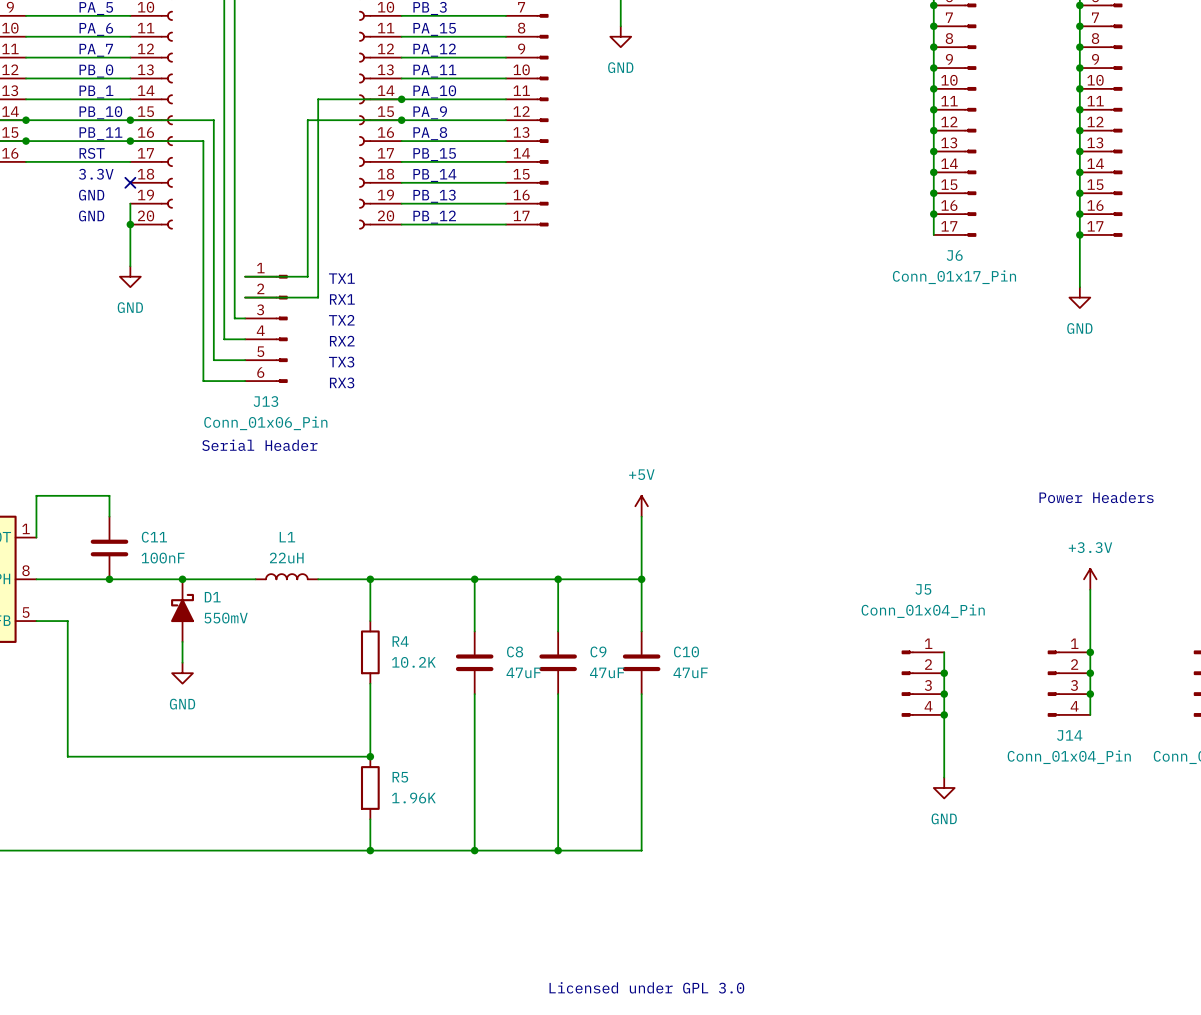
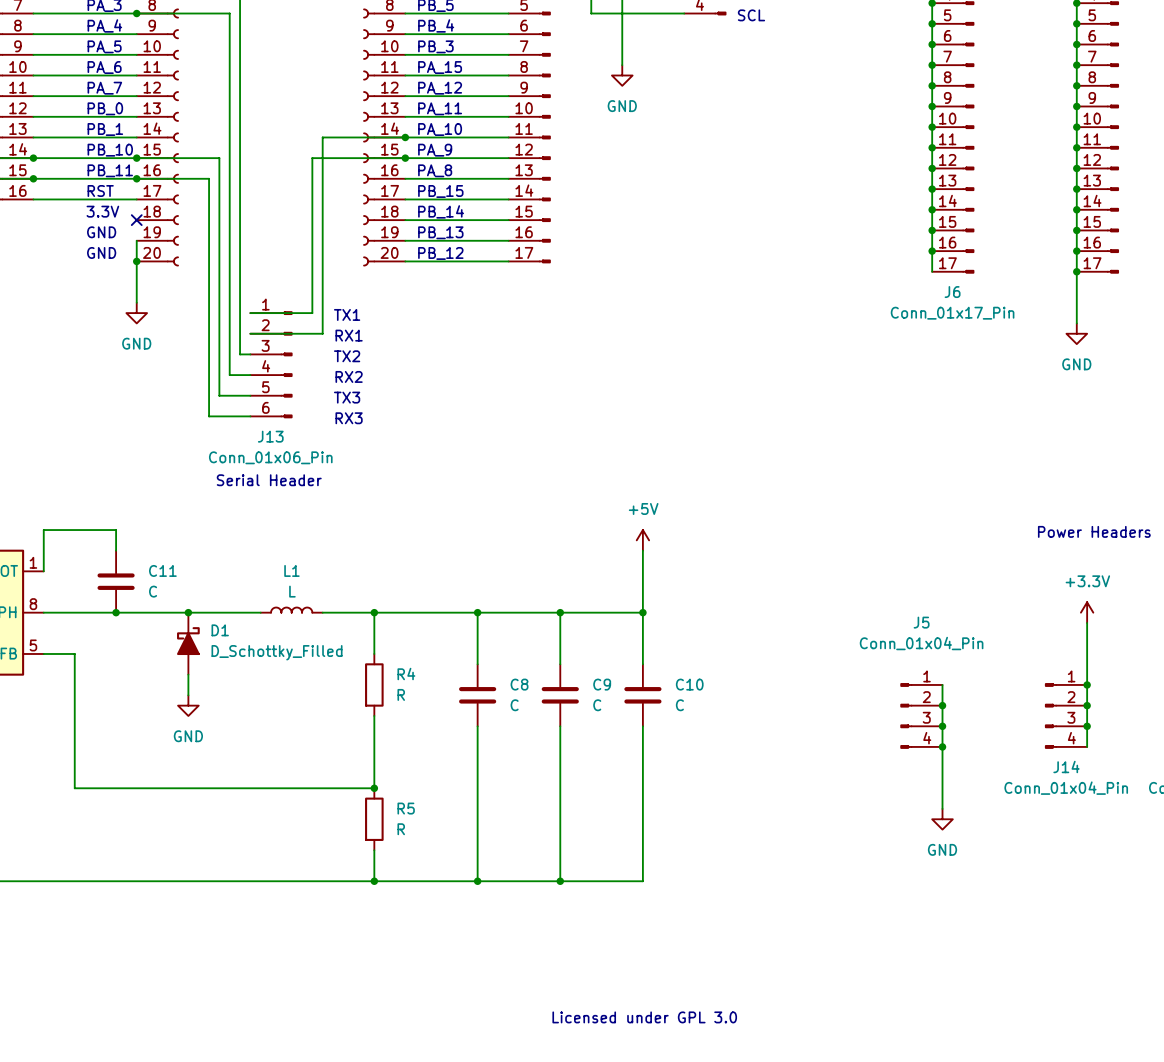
C11 value: 100nF (163, 558) -> C (153, 591)
L1 value: 22uH (286, 558) -> L (292, 591)
D1 value: 550mV (226, 618) -> D_Schottky_Filled (277, 652)
R4 value: 10.2K (413, 662) -> R (401, 694)
C8 value: 47uF (523, 672) -> C (514, 705)
C9 value: 47uF (607, 672) -> C (597, 705)
C10 value: 47uF (690, 672) -> C (679, 705)
R5 value: 1.96K (413, 798) -> R (401, 829)

